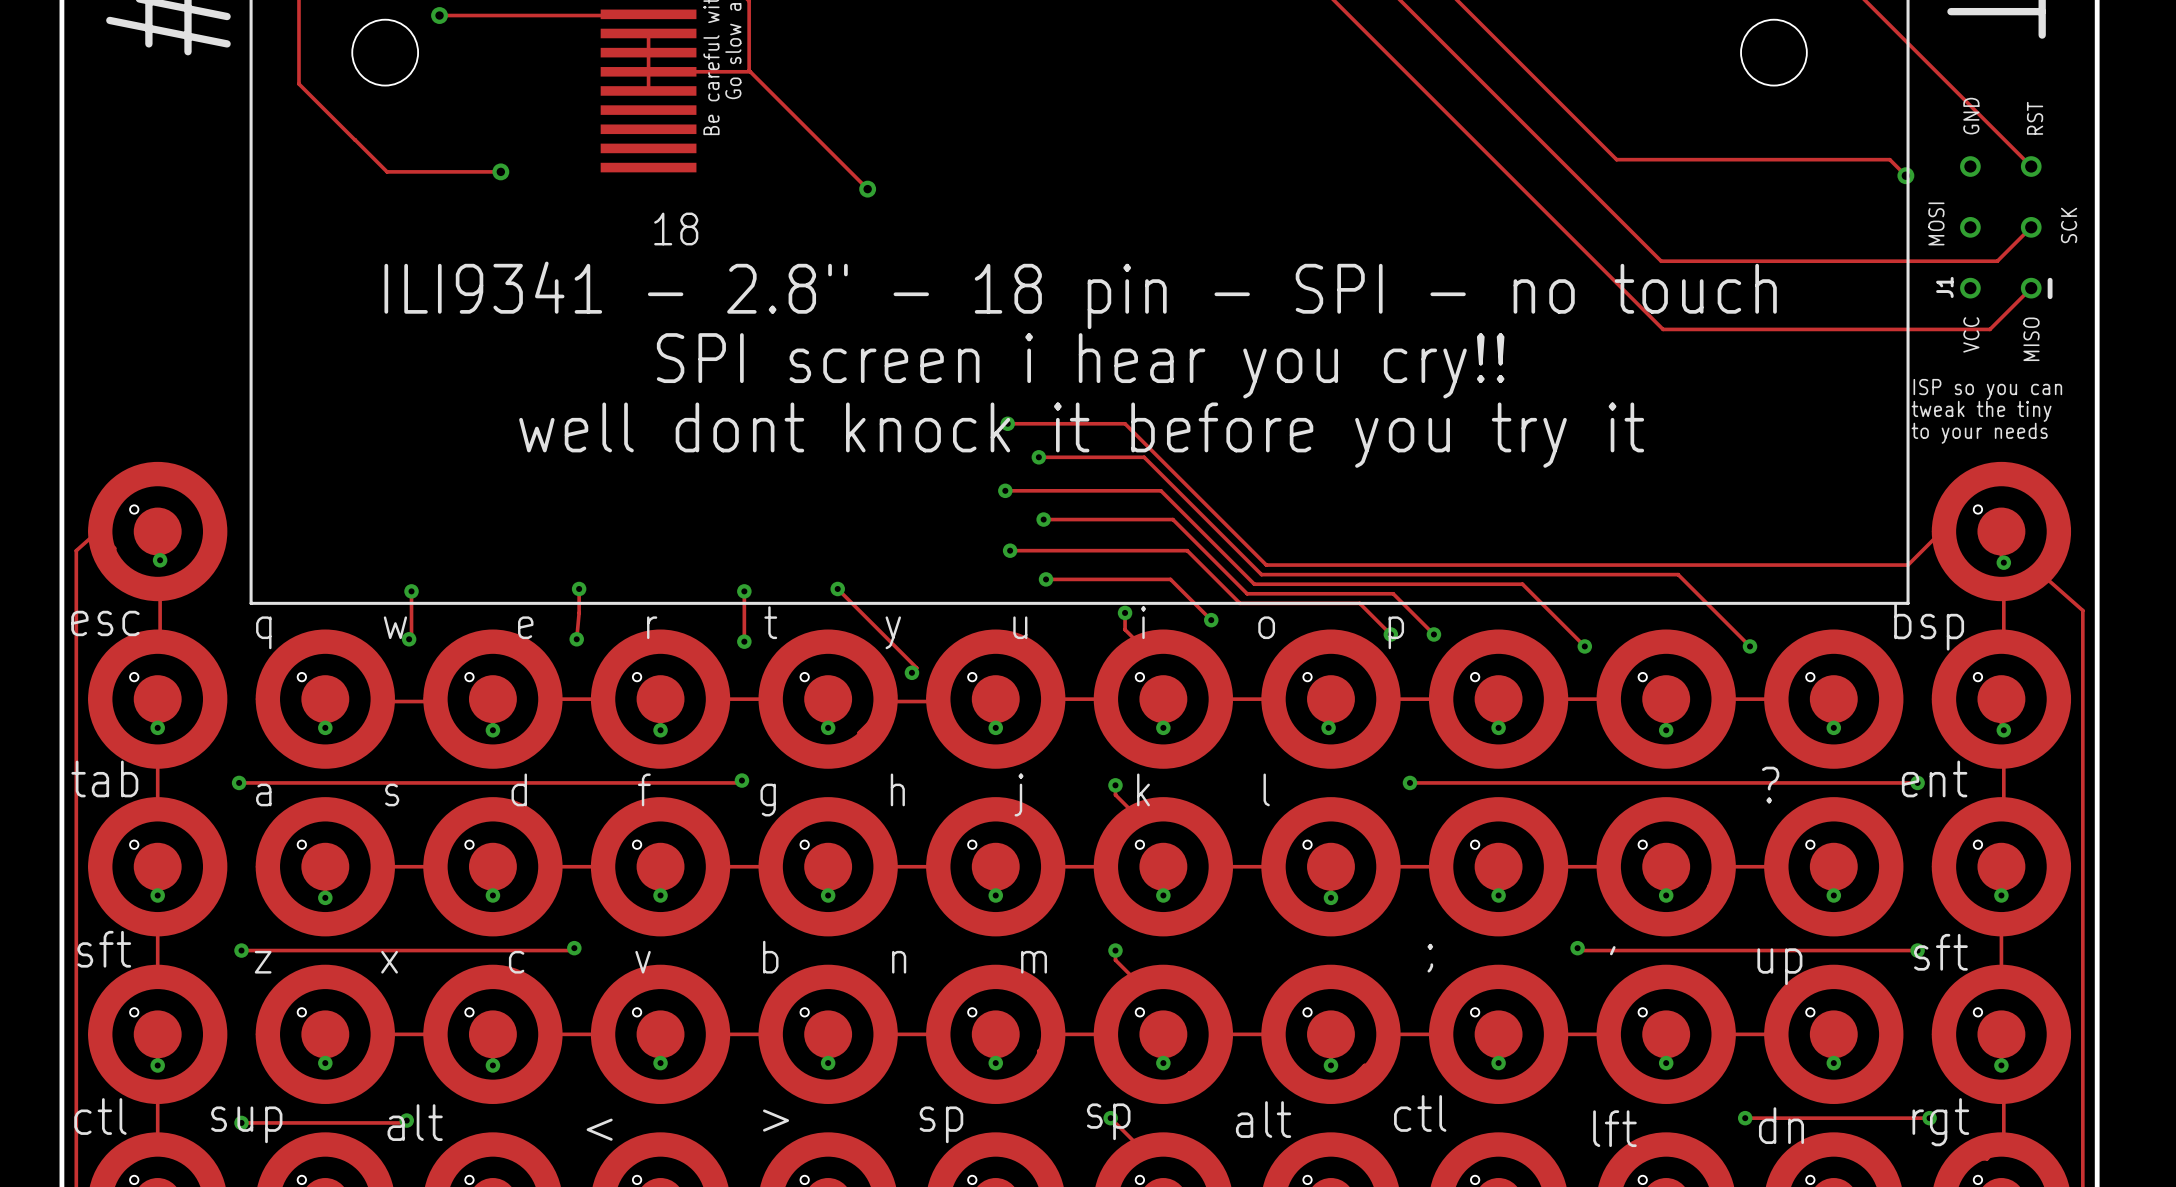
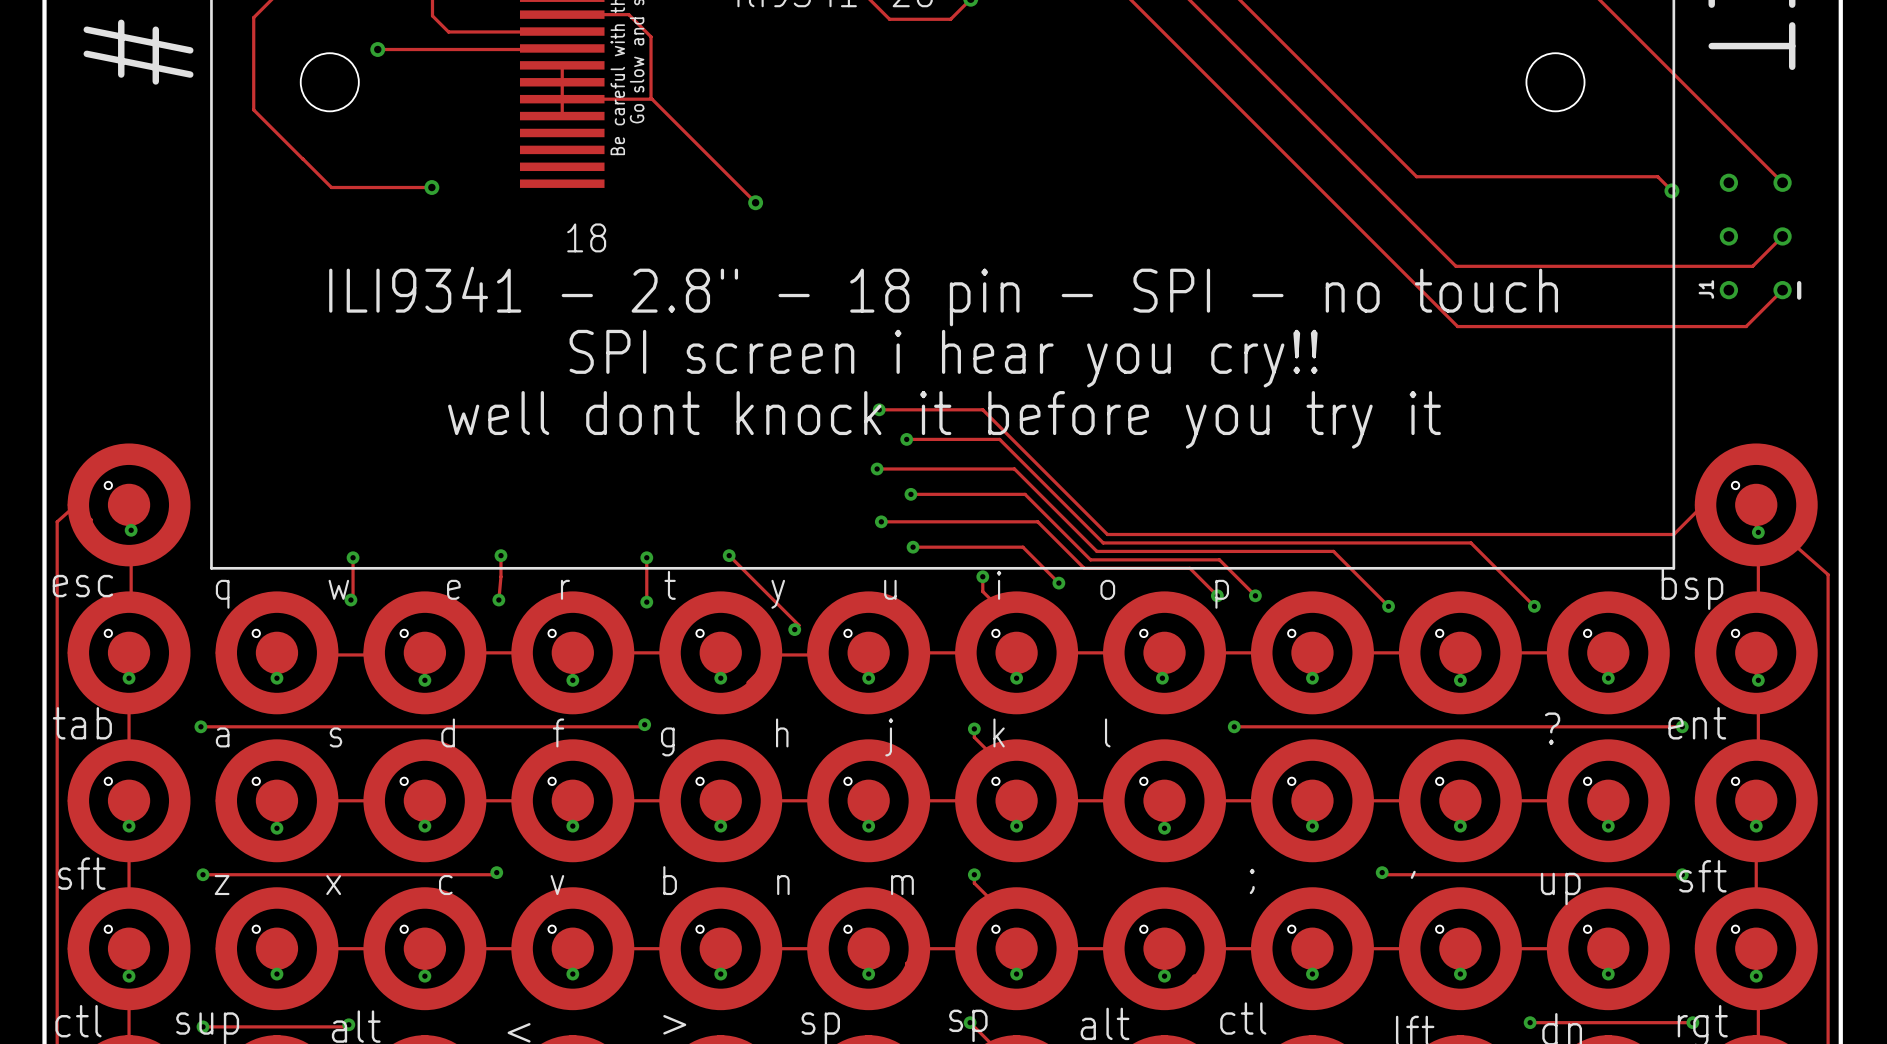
text: GND (1971, 116) -> none
text: RST (2035, 118) -> none
text: MOSI (1936, 223) -> none
text: SCK (2069, 225) -> none
text: VCC (1971, 334) -> none
text: MISO (2031, 339) -> none
text: ISP so you can (1987, 389) -> none
text: tweak the tiny (1981, 411) -> none
text: to your needs (1979, 433) -> none

